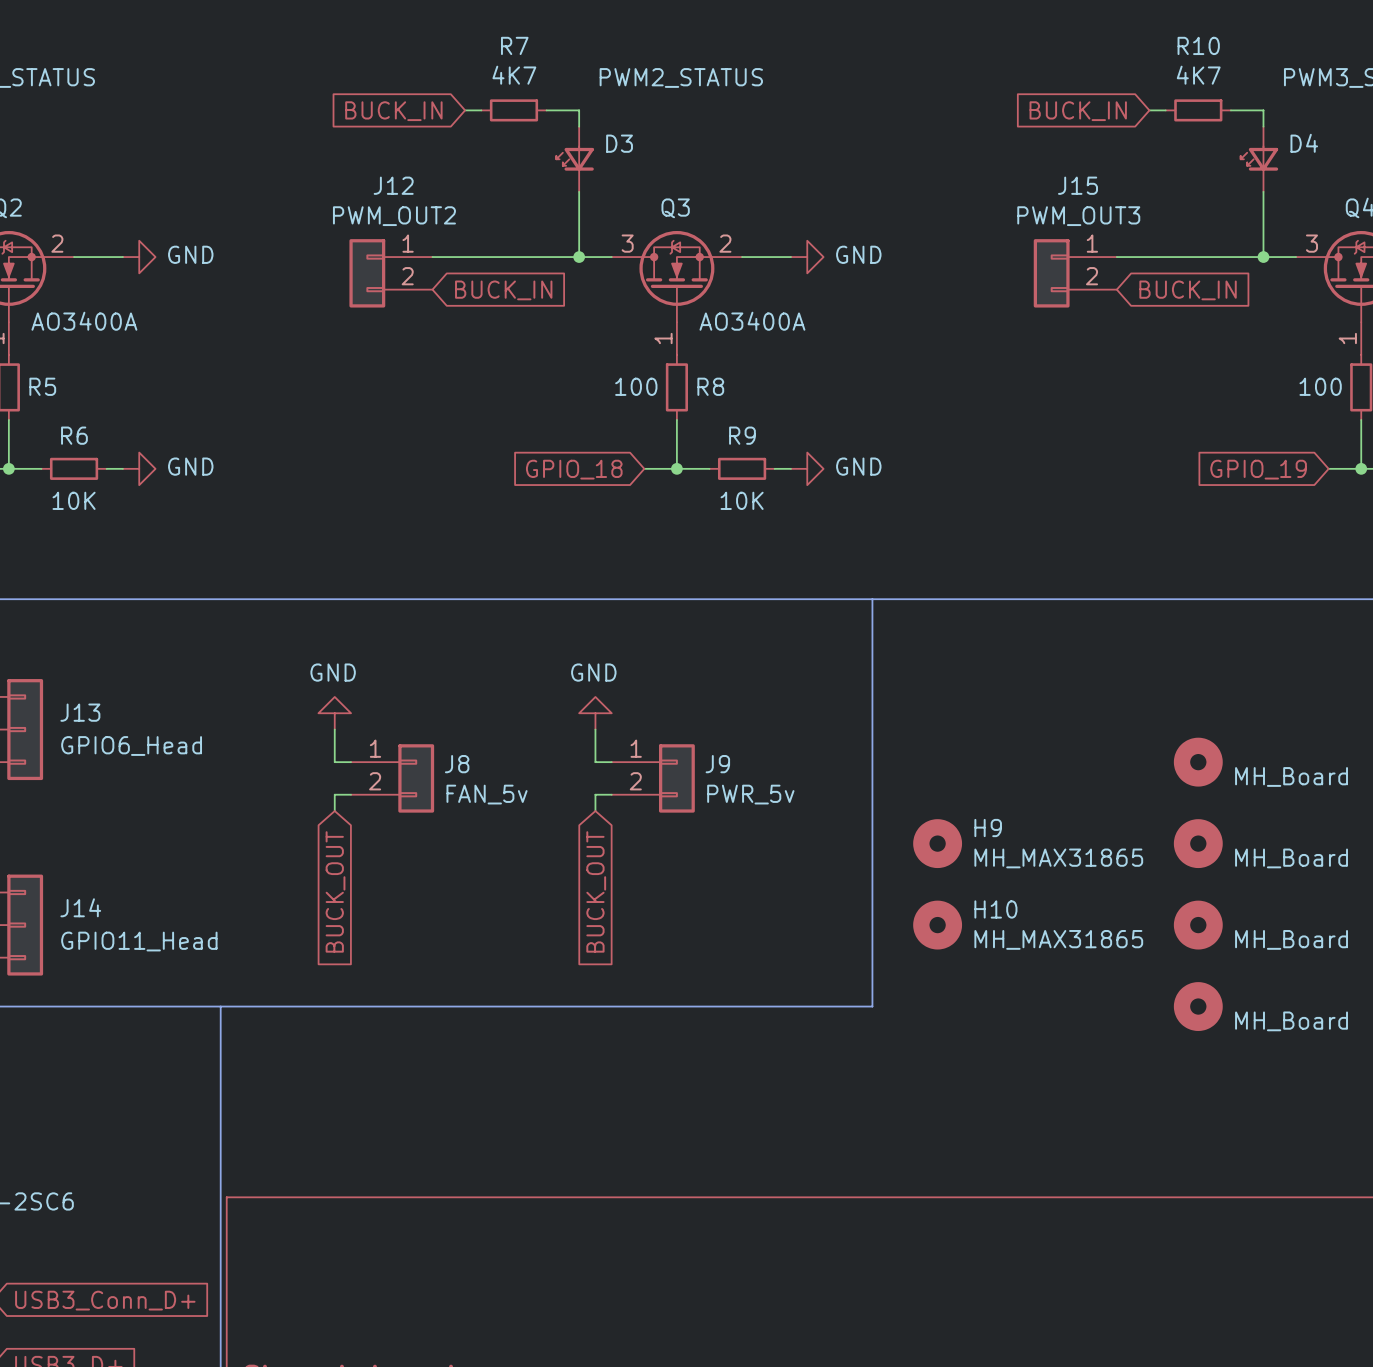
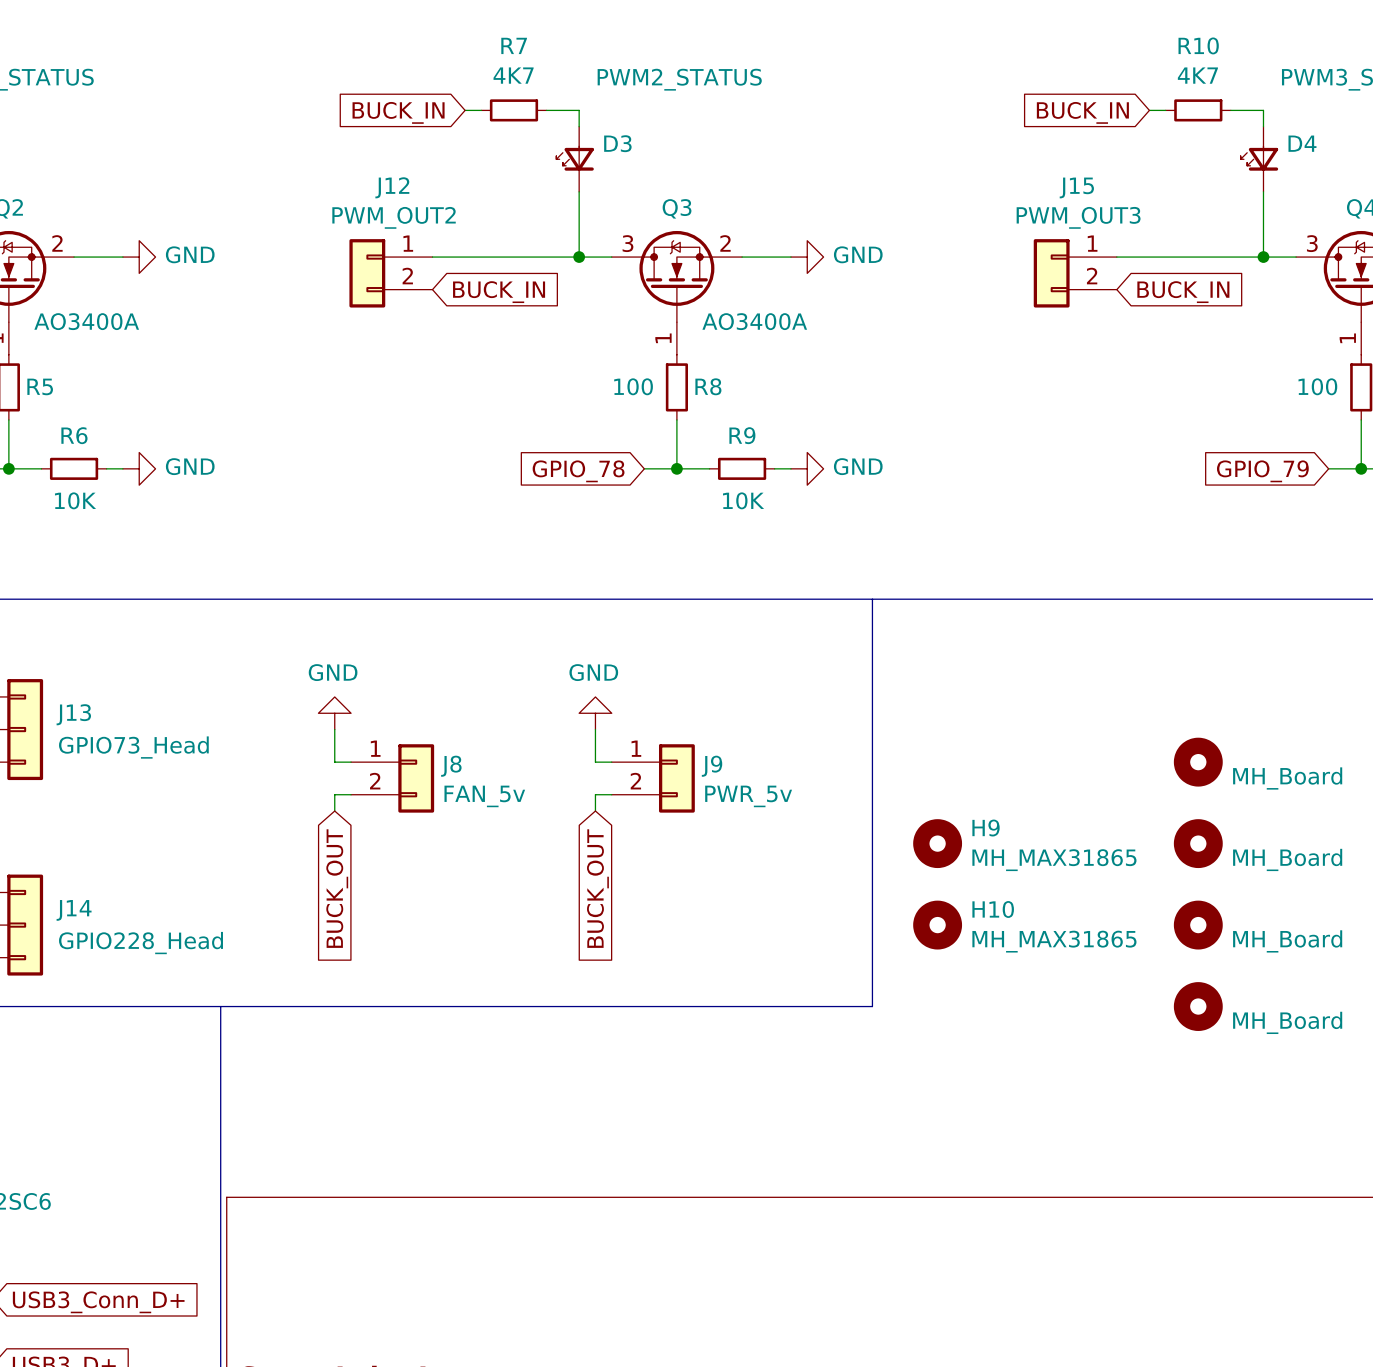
global label: GPIO_18 (574, 469) -> GPIO_78 (578, 471)
global label: GPIO_19 (1258, 469) -> GPIO_79 (1262, 471)
J13 value: GPIO6_Head (131, 746) -> GPIO73_Head (133, 747)
J14 value: GPIO11_Head (139, 941) -> GPIO228_Head (140, 943)

